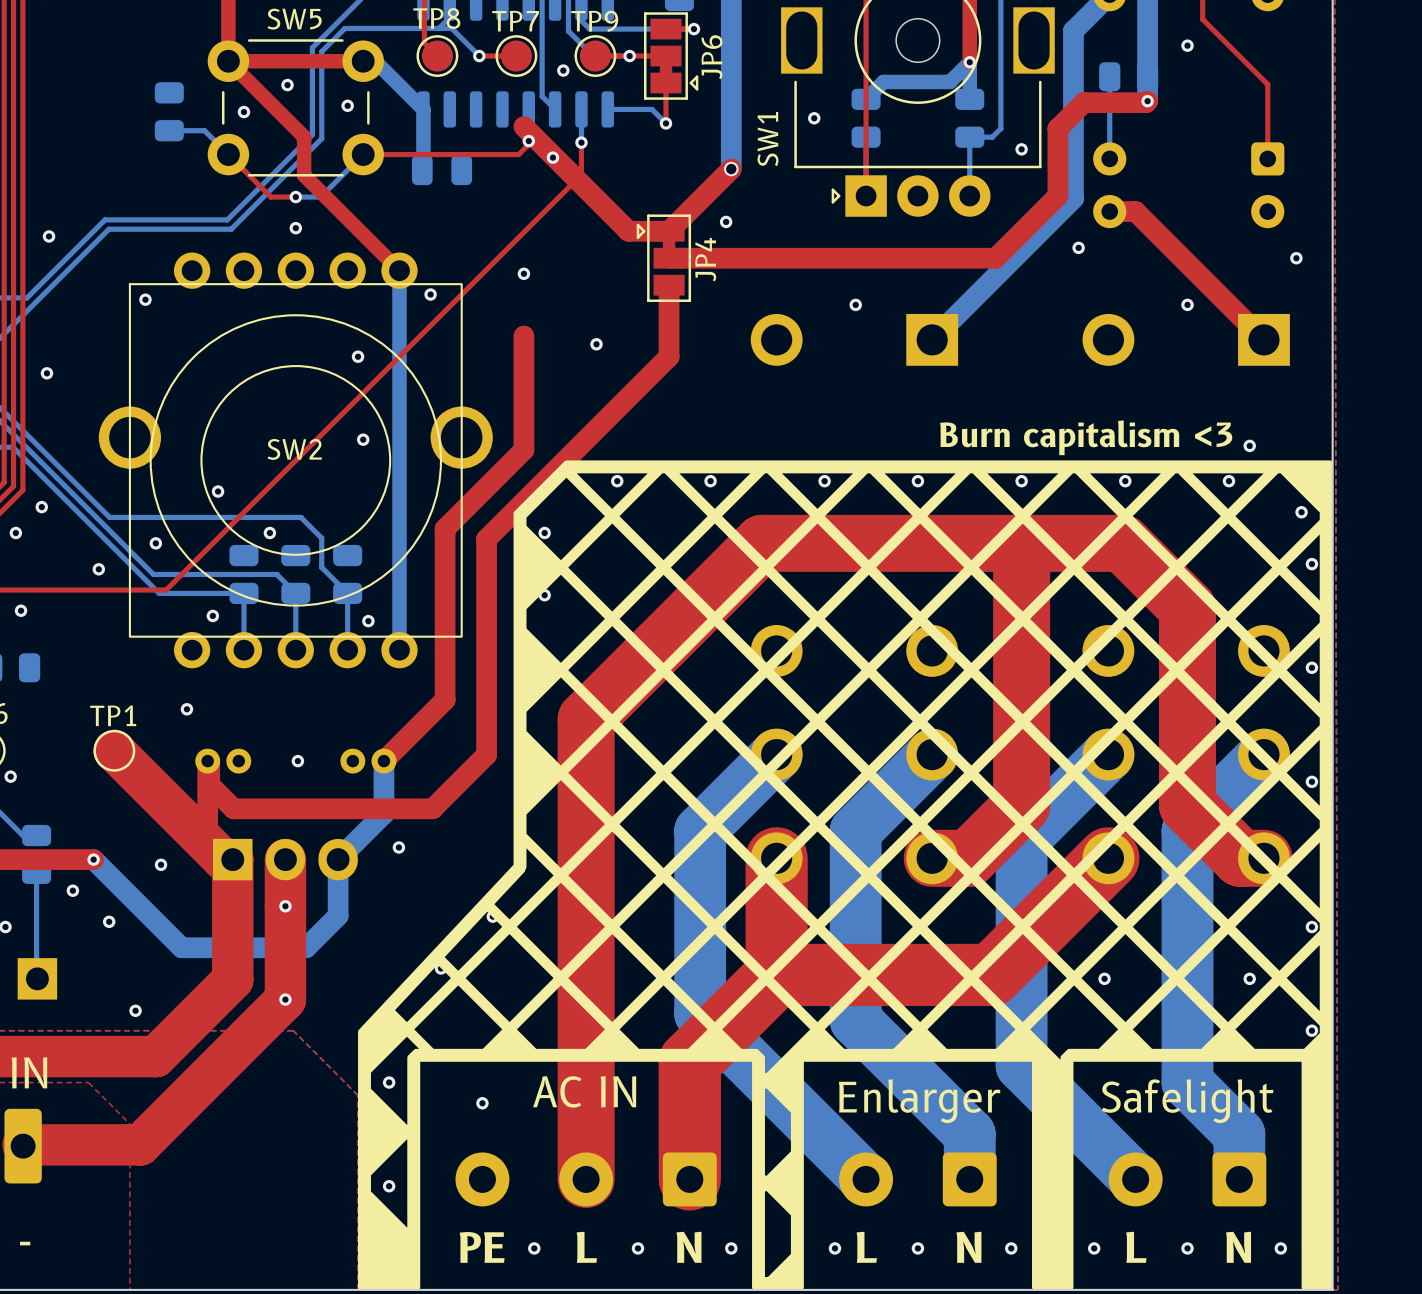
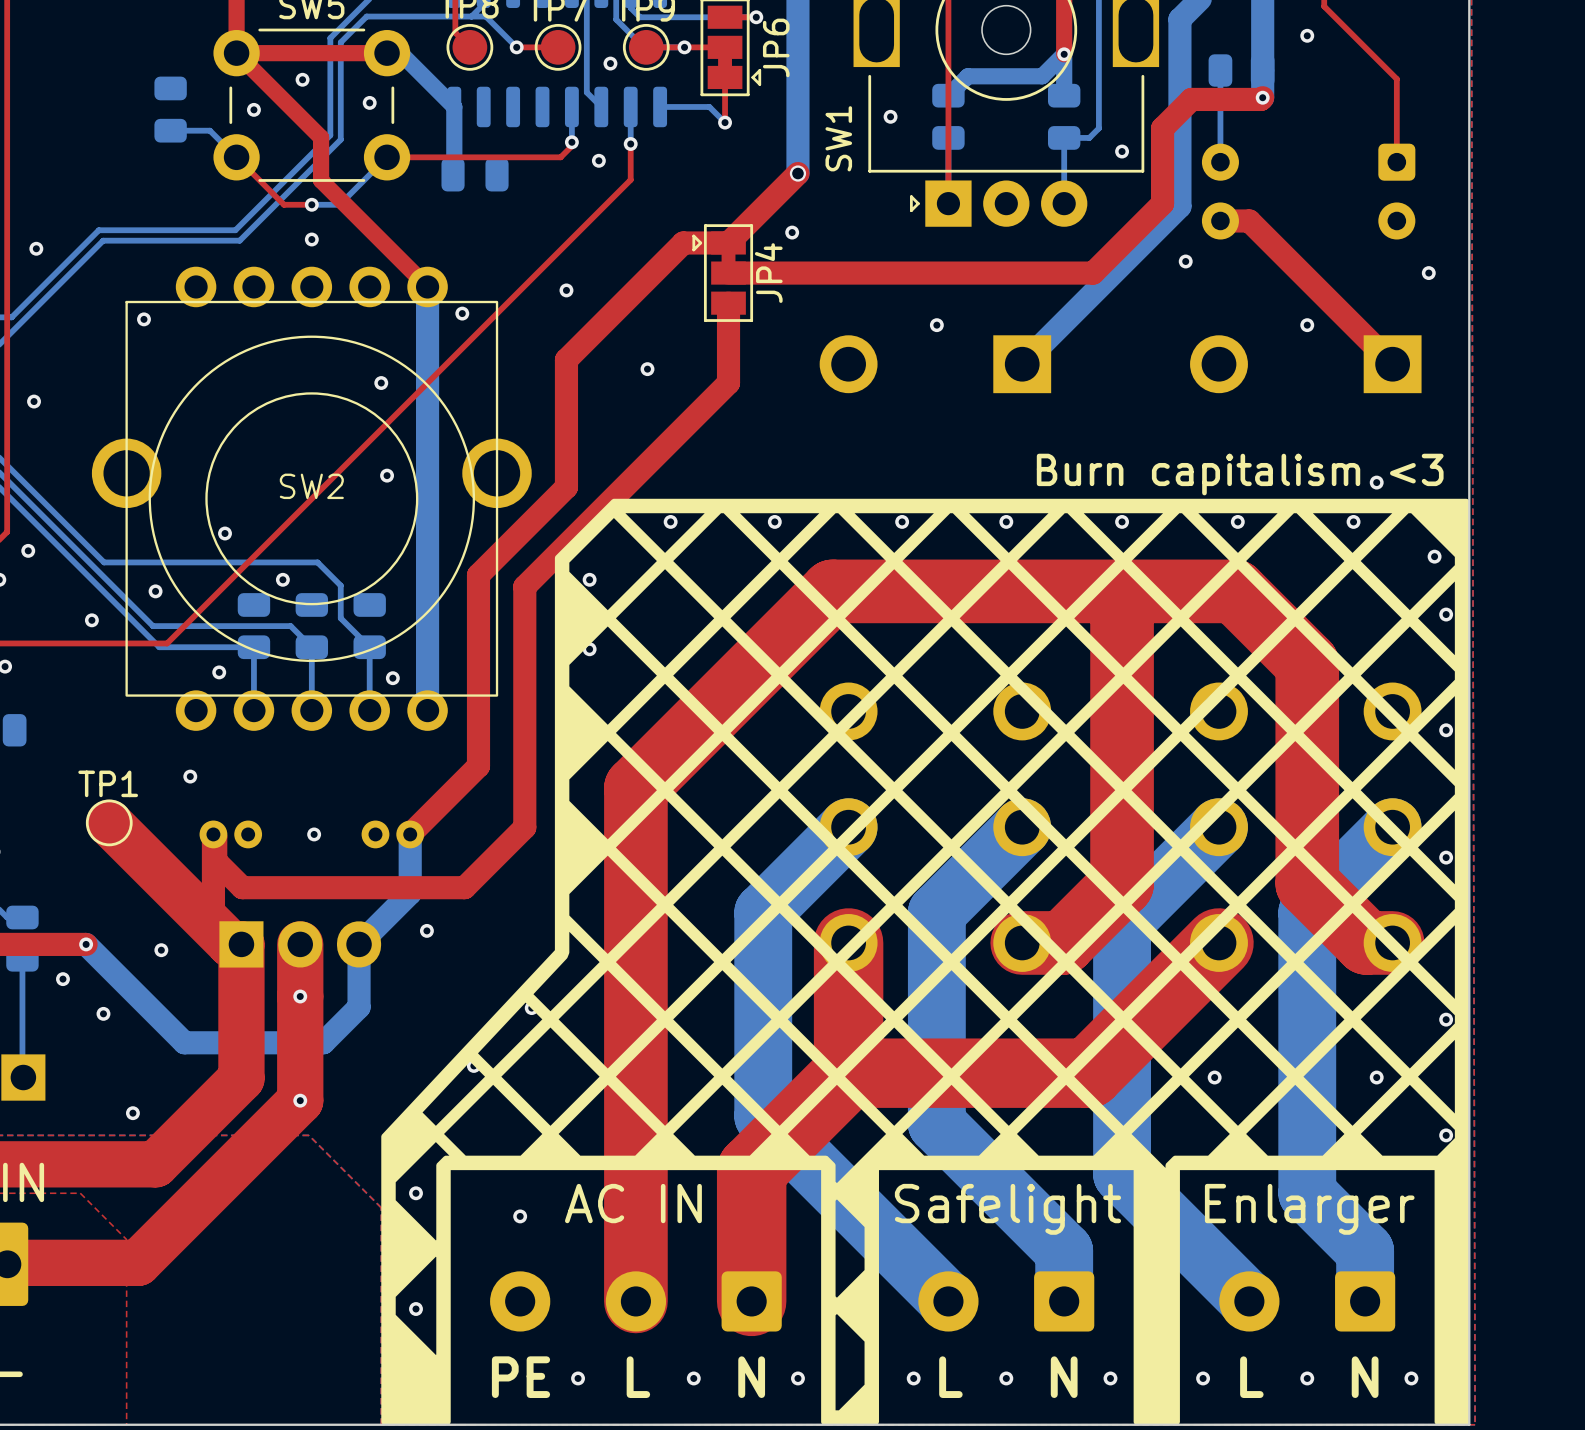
top track: (523, 126) (628, 231) -> (566, 359) (683, 242)
bottom track width: thin (399, 270) (399, 650) -> thick (427, 286) (427, 710)
text: Enlarger (919, 1101) -> Safelight (1007, 1209)
text: Safelight (1187, 1101) -> Enlarger (1309, 1209)

